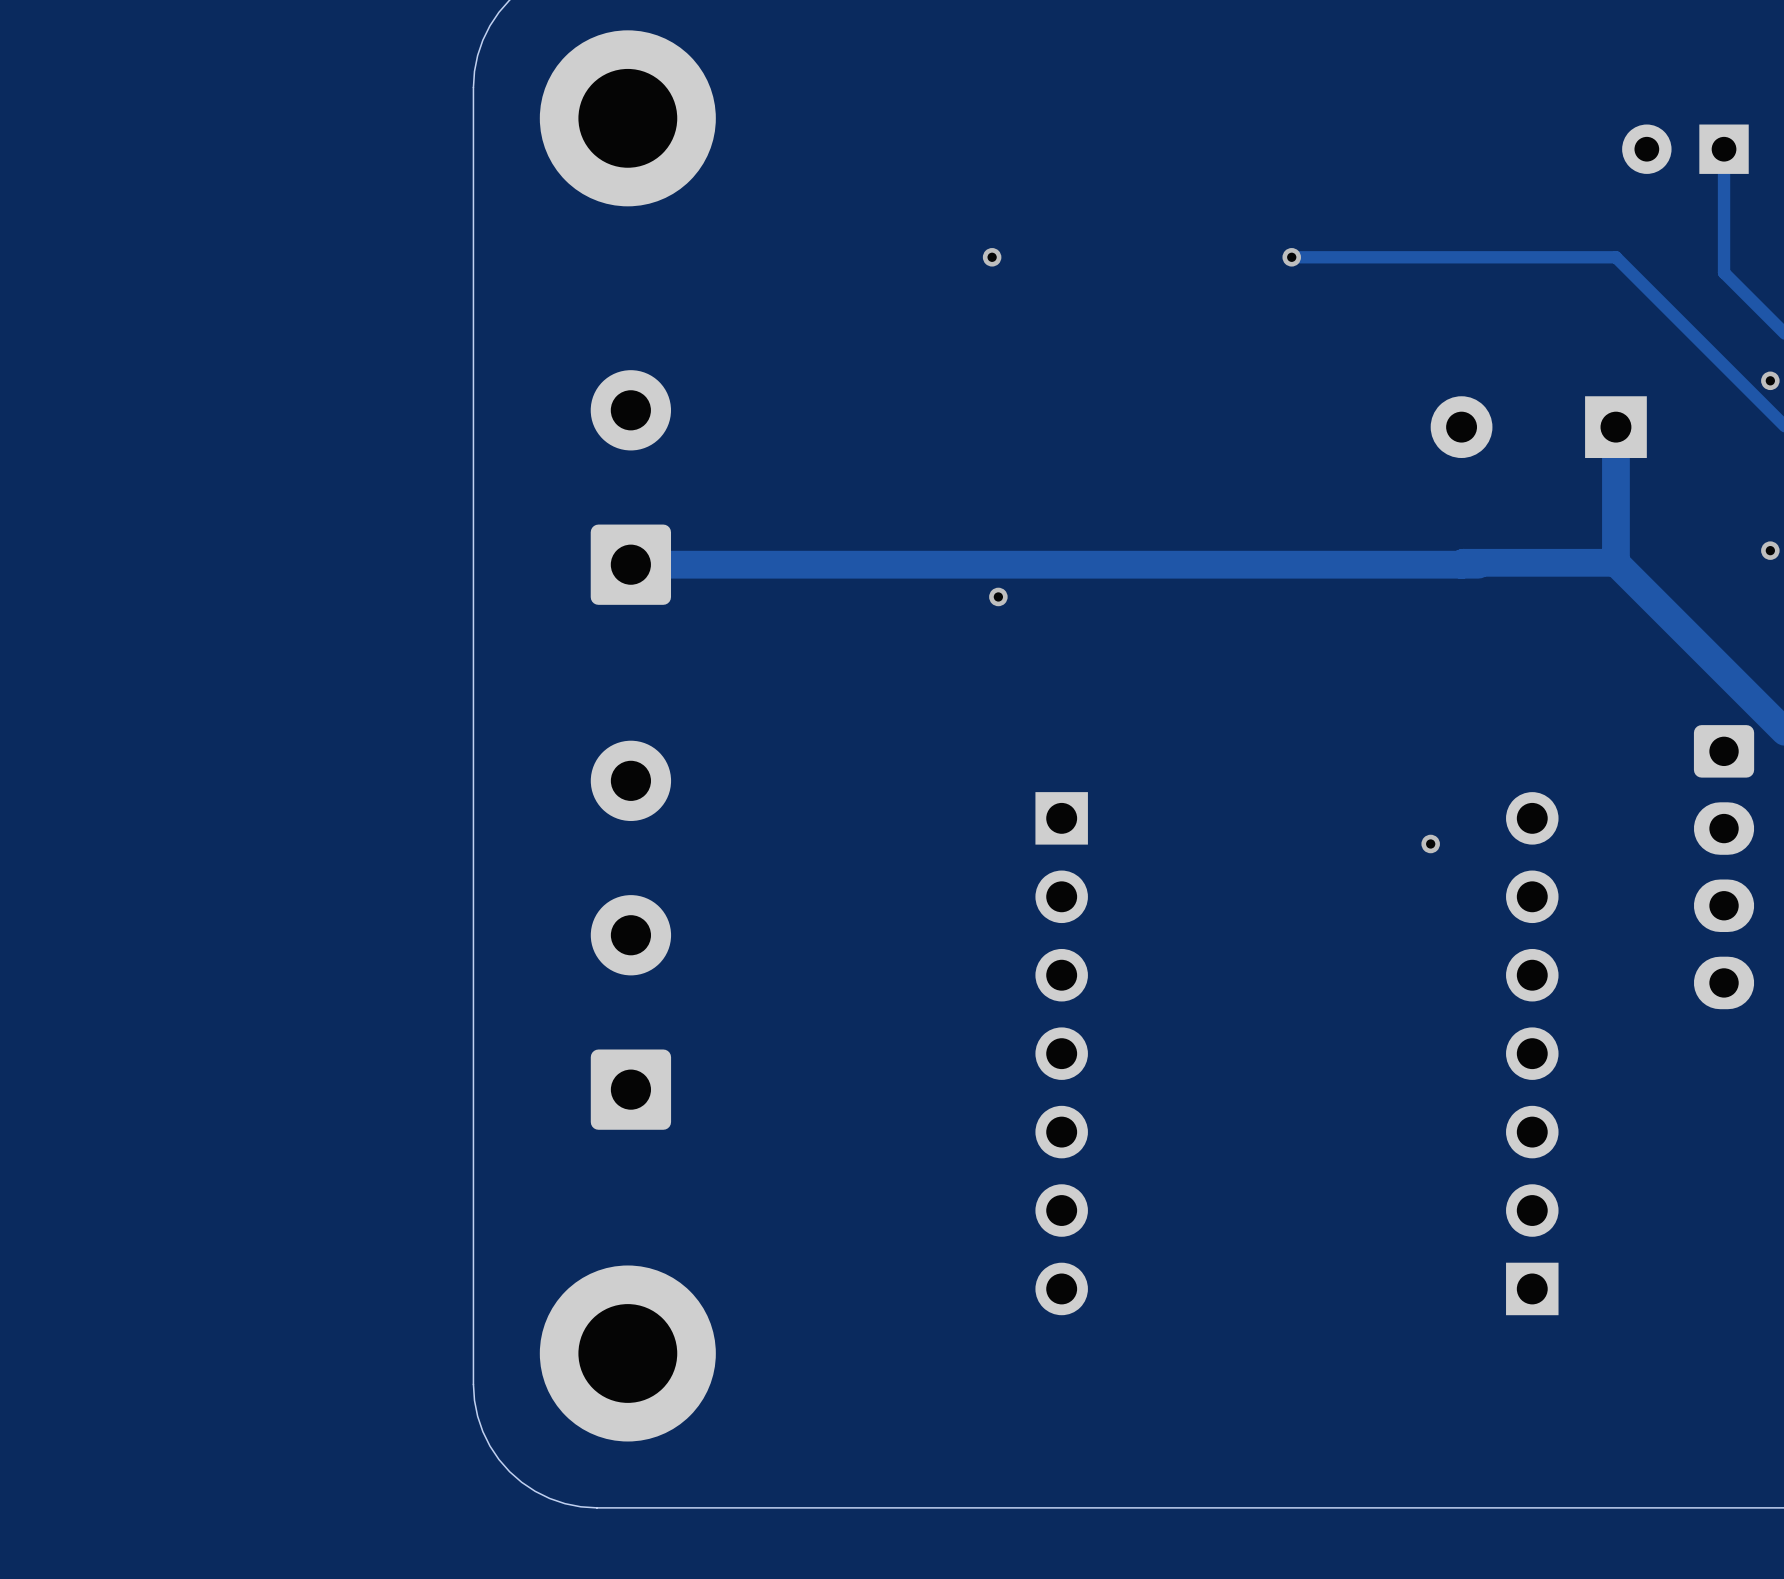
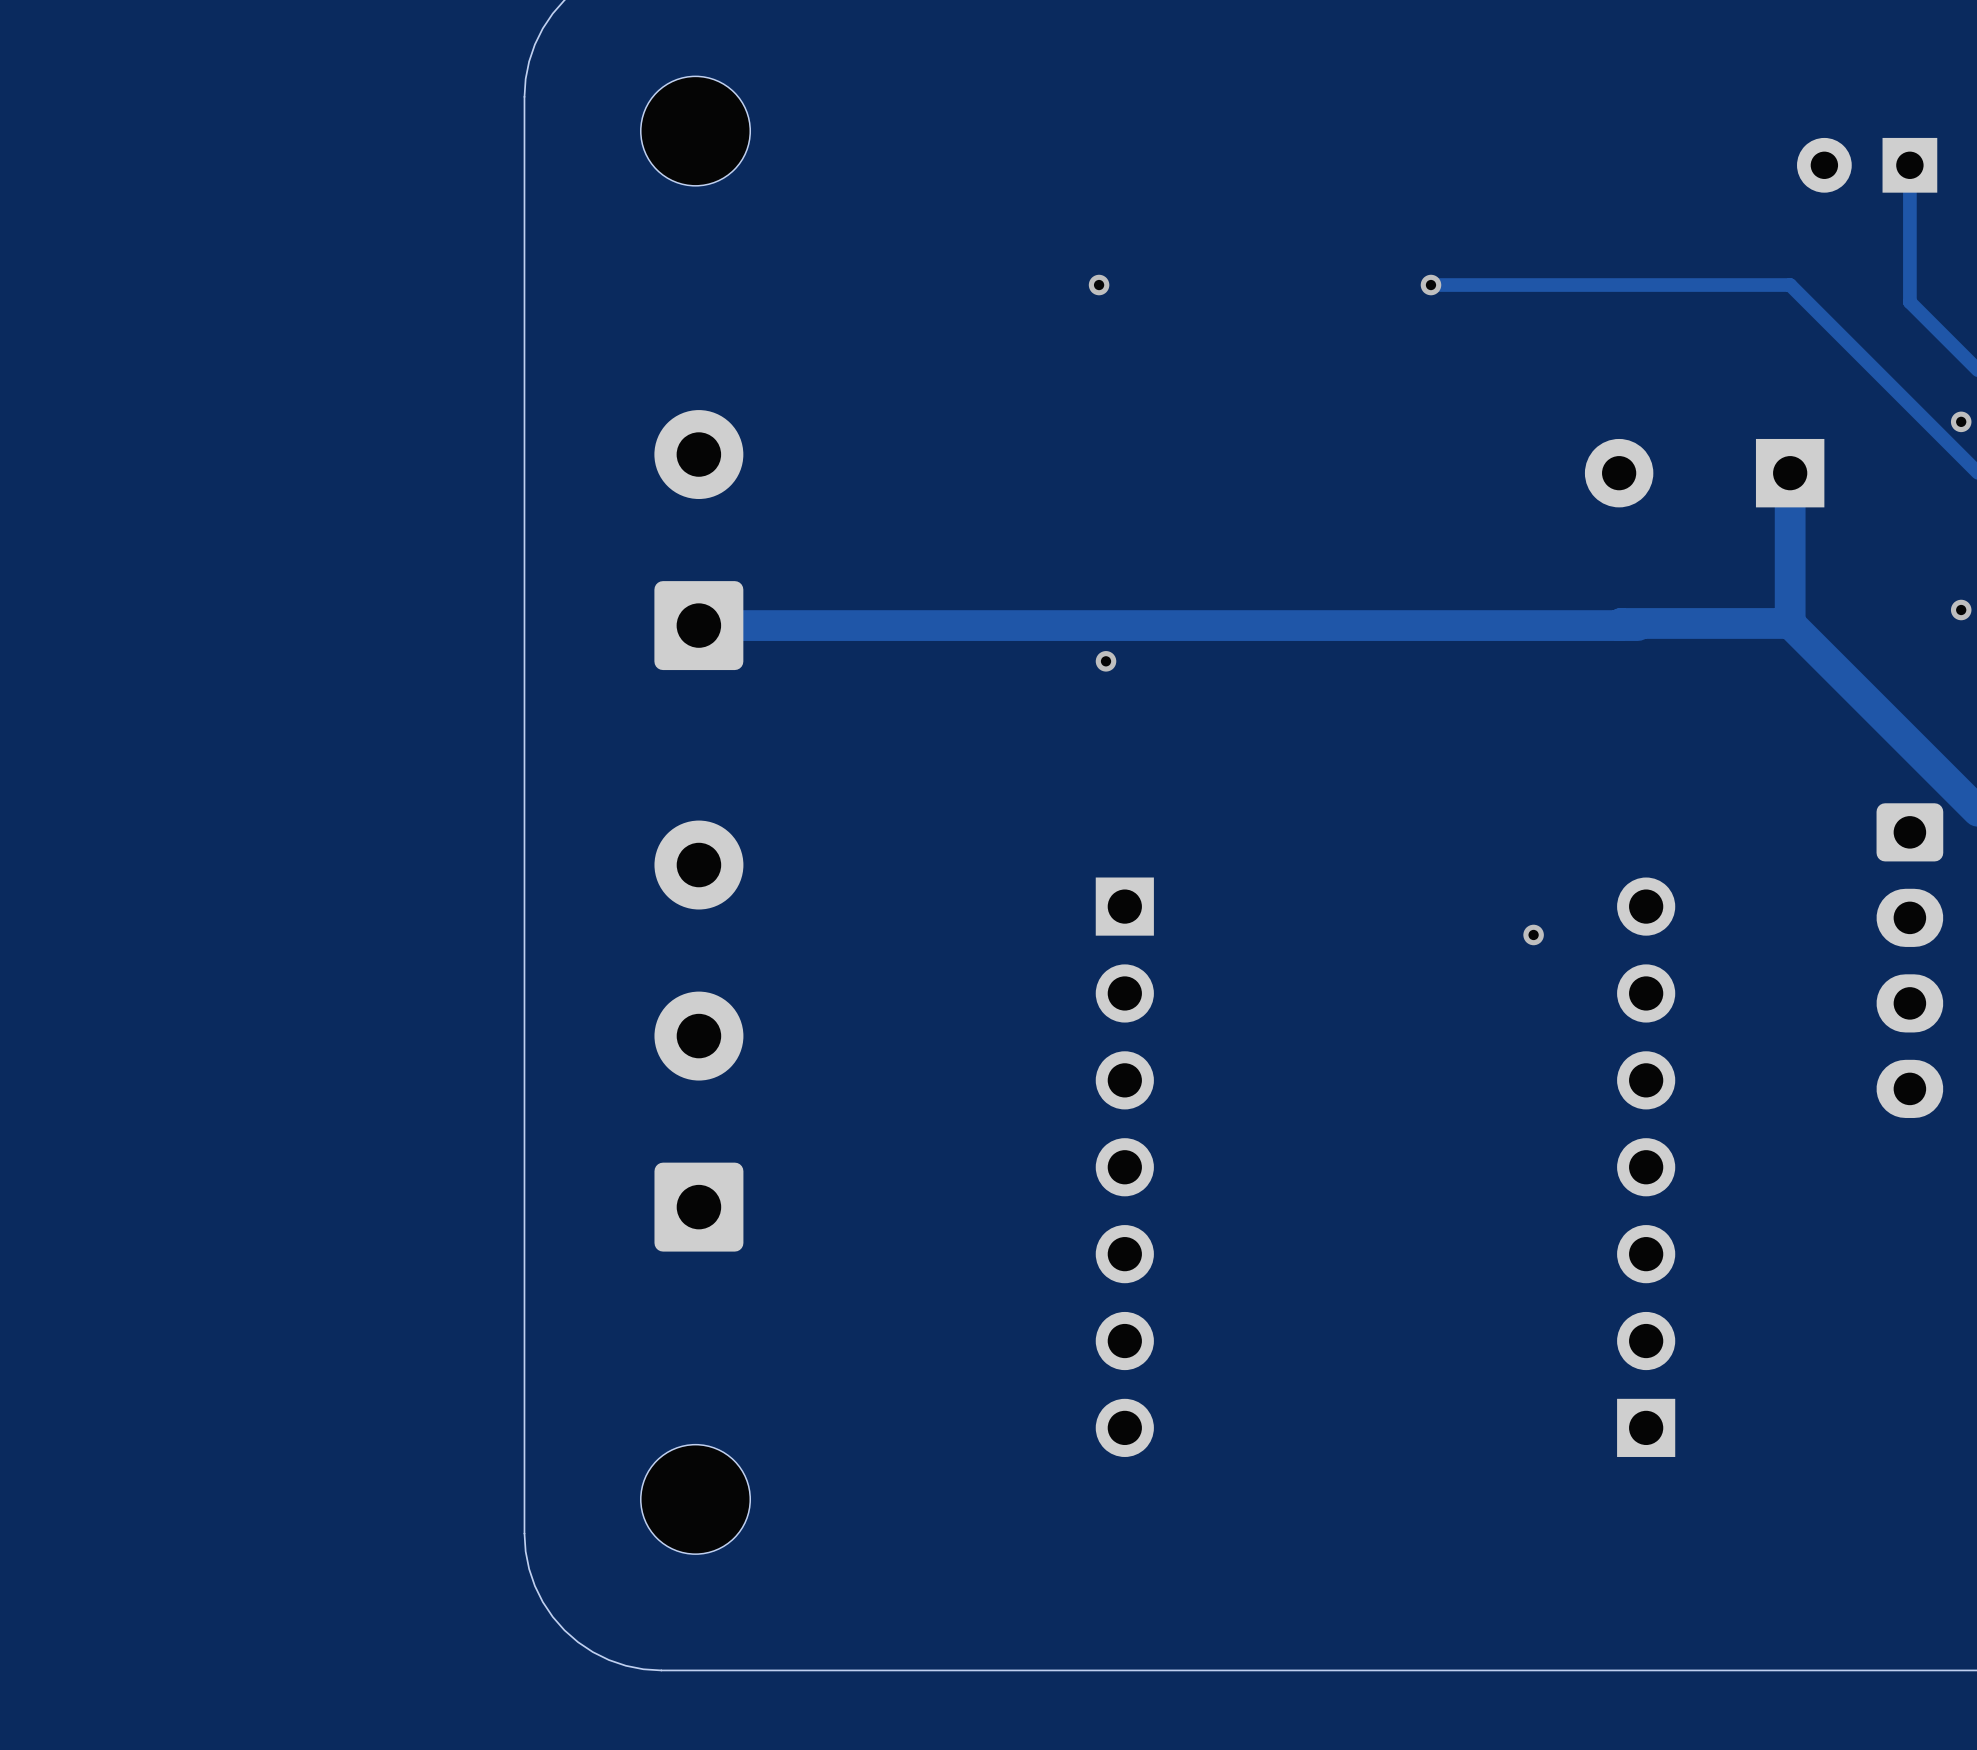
part footprint: [539, 30, 716, 207] -> [640, 76, 751, 186]
via position: (1430, 843) -> (1533, 934)
part position: (1061, 1053) -> (1124, 1167)
part position: (1532, 1053) -> (1646, 1167)
part footprint: [539, 1265, 716, 1442] -> [640, 1444, 751, 1555]

